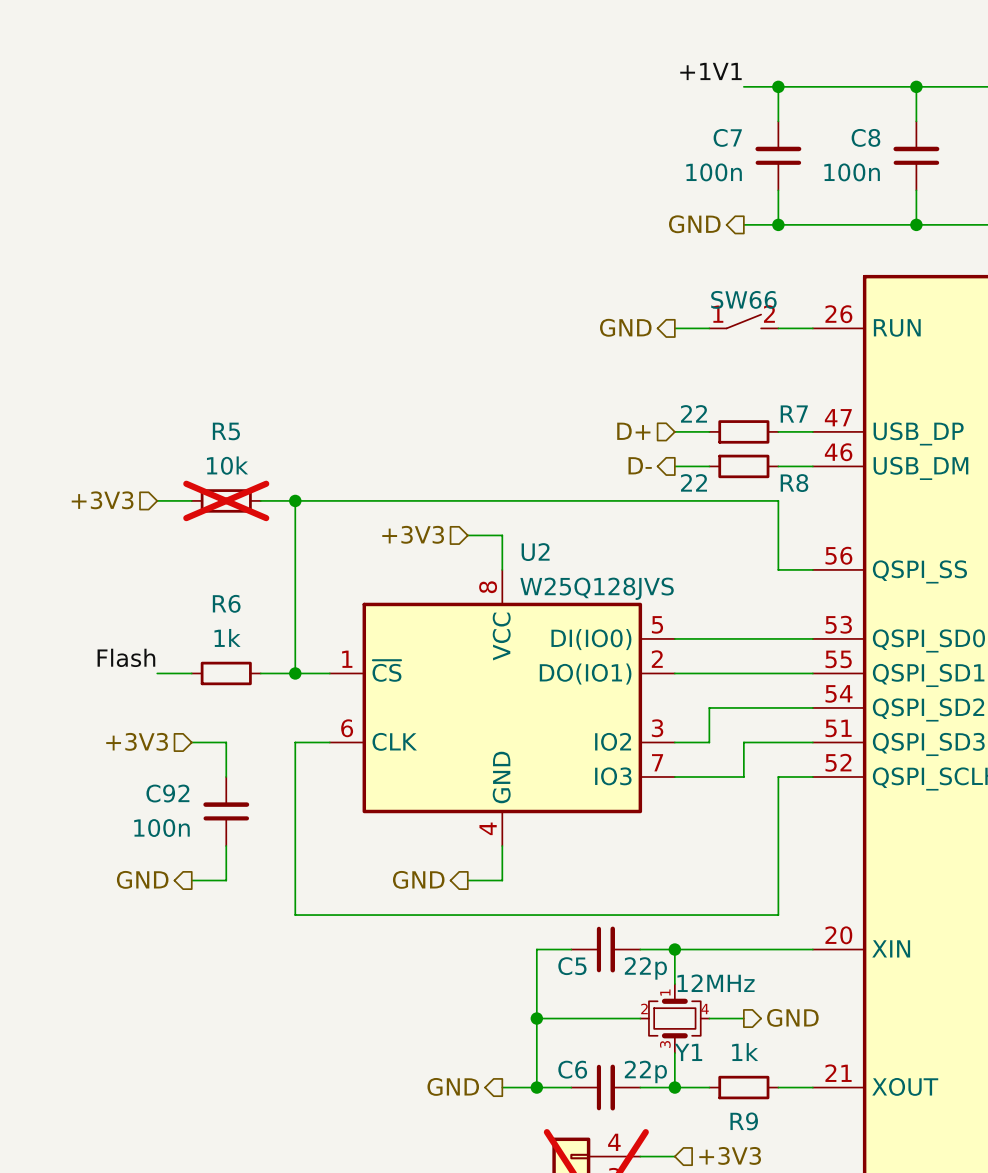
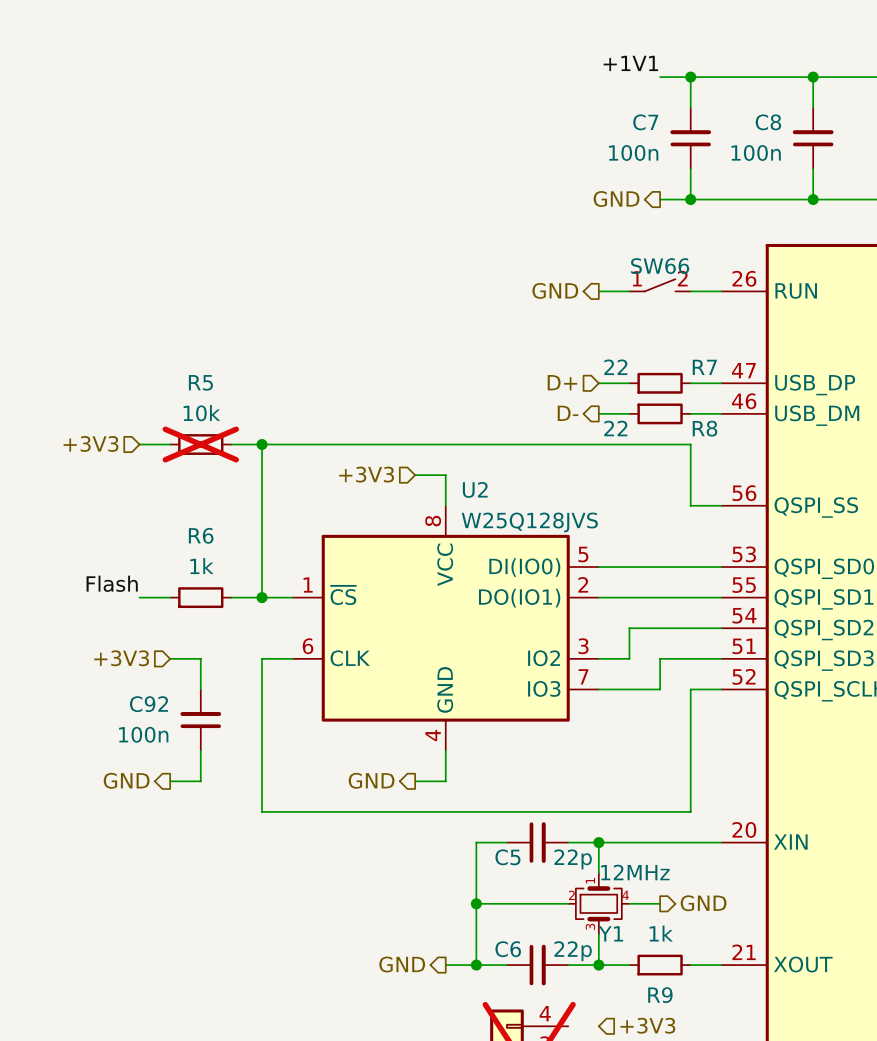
wire: (640, 1156) (674, 1156) -> none

